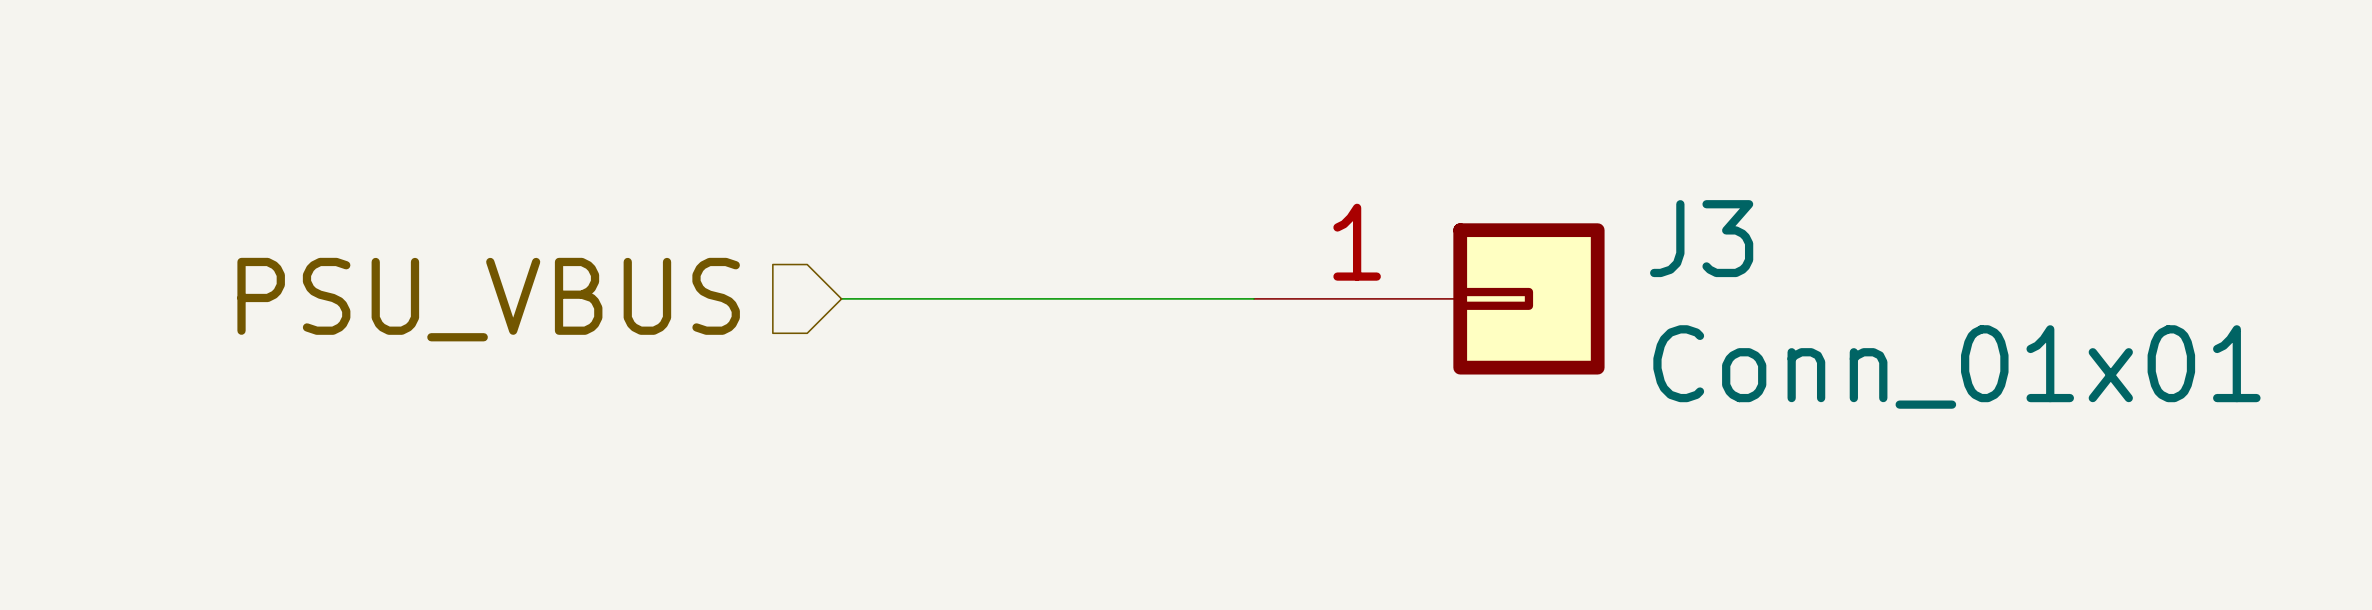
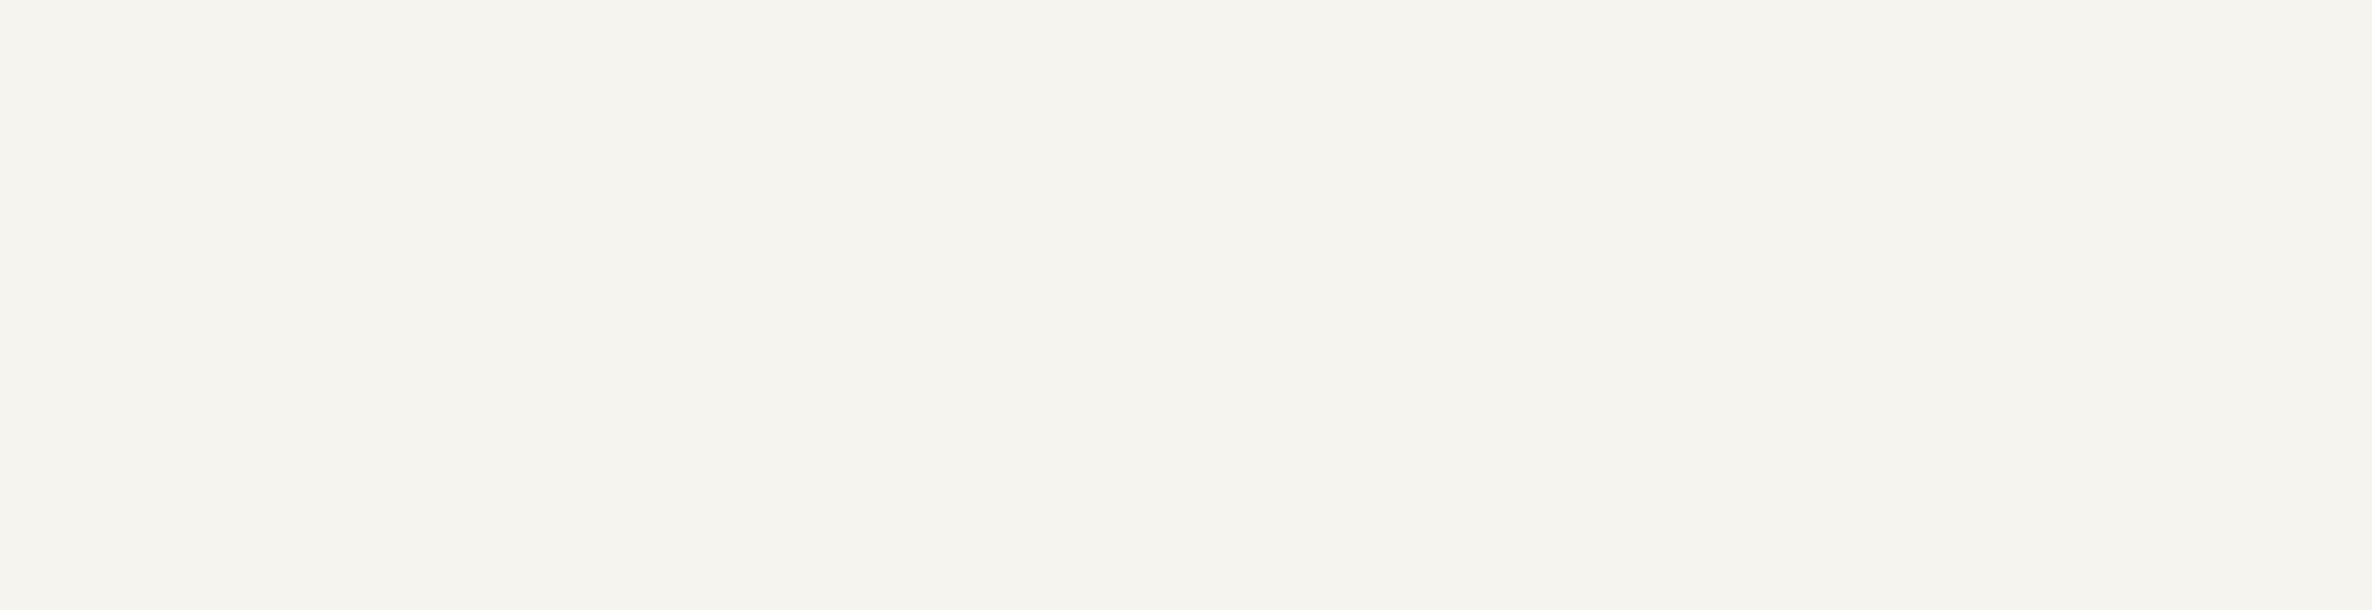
wire: (841, 298) (1254, 298) -> none
J3: Conn_01x01 (1429, 298) -> none
hierarchical label: PSU_VBUS (488, 299) -> none

